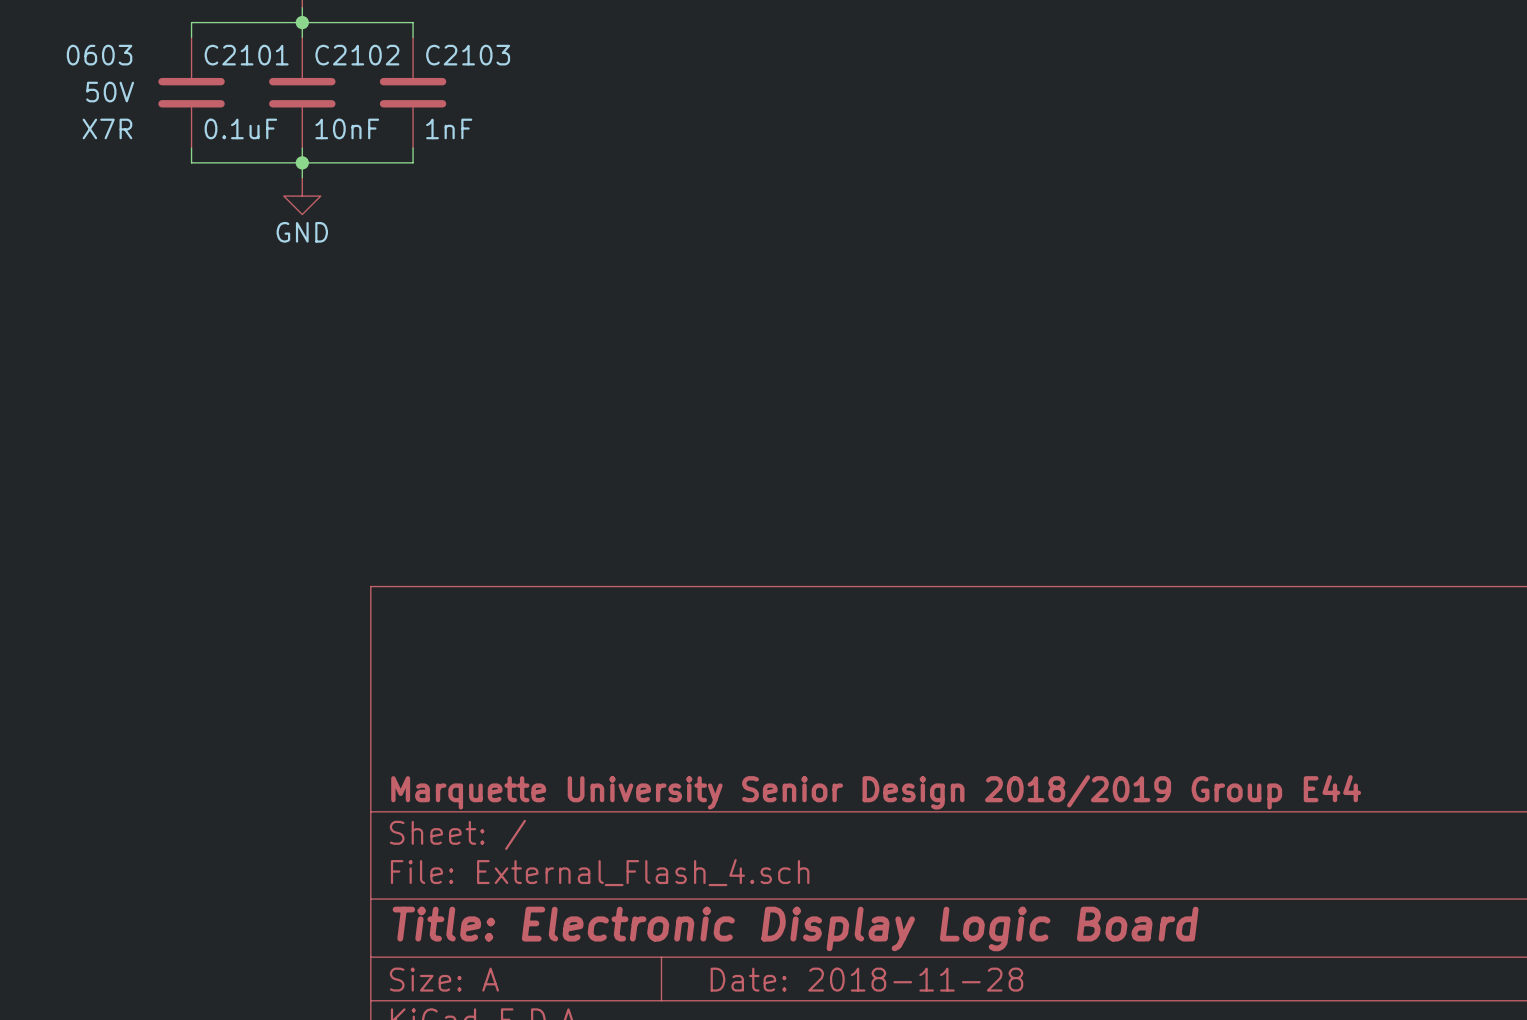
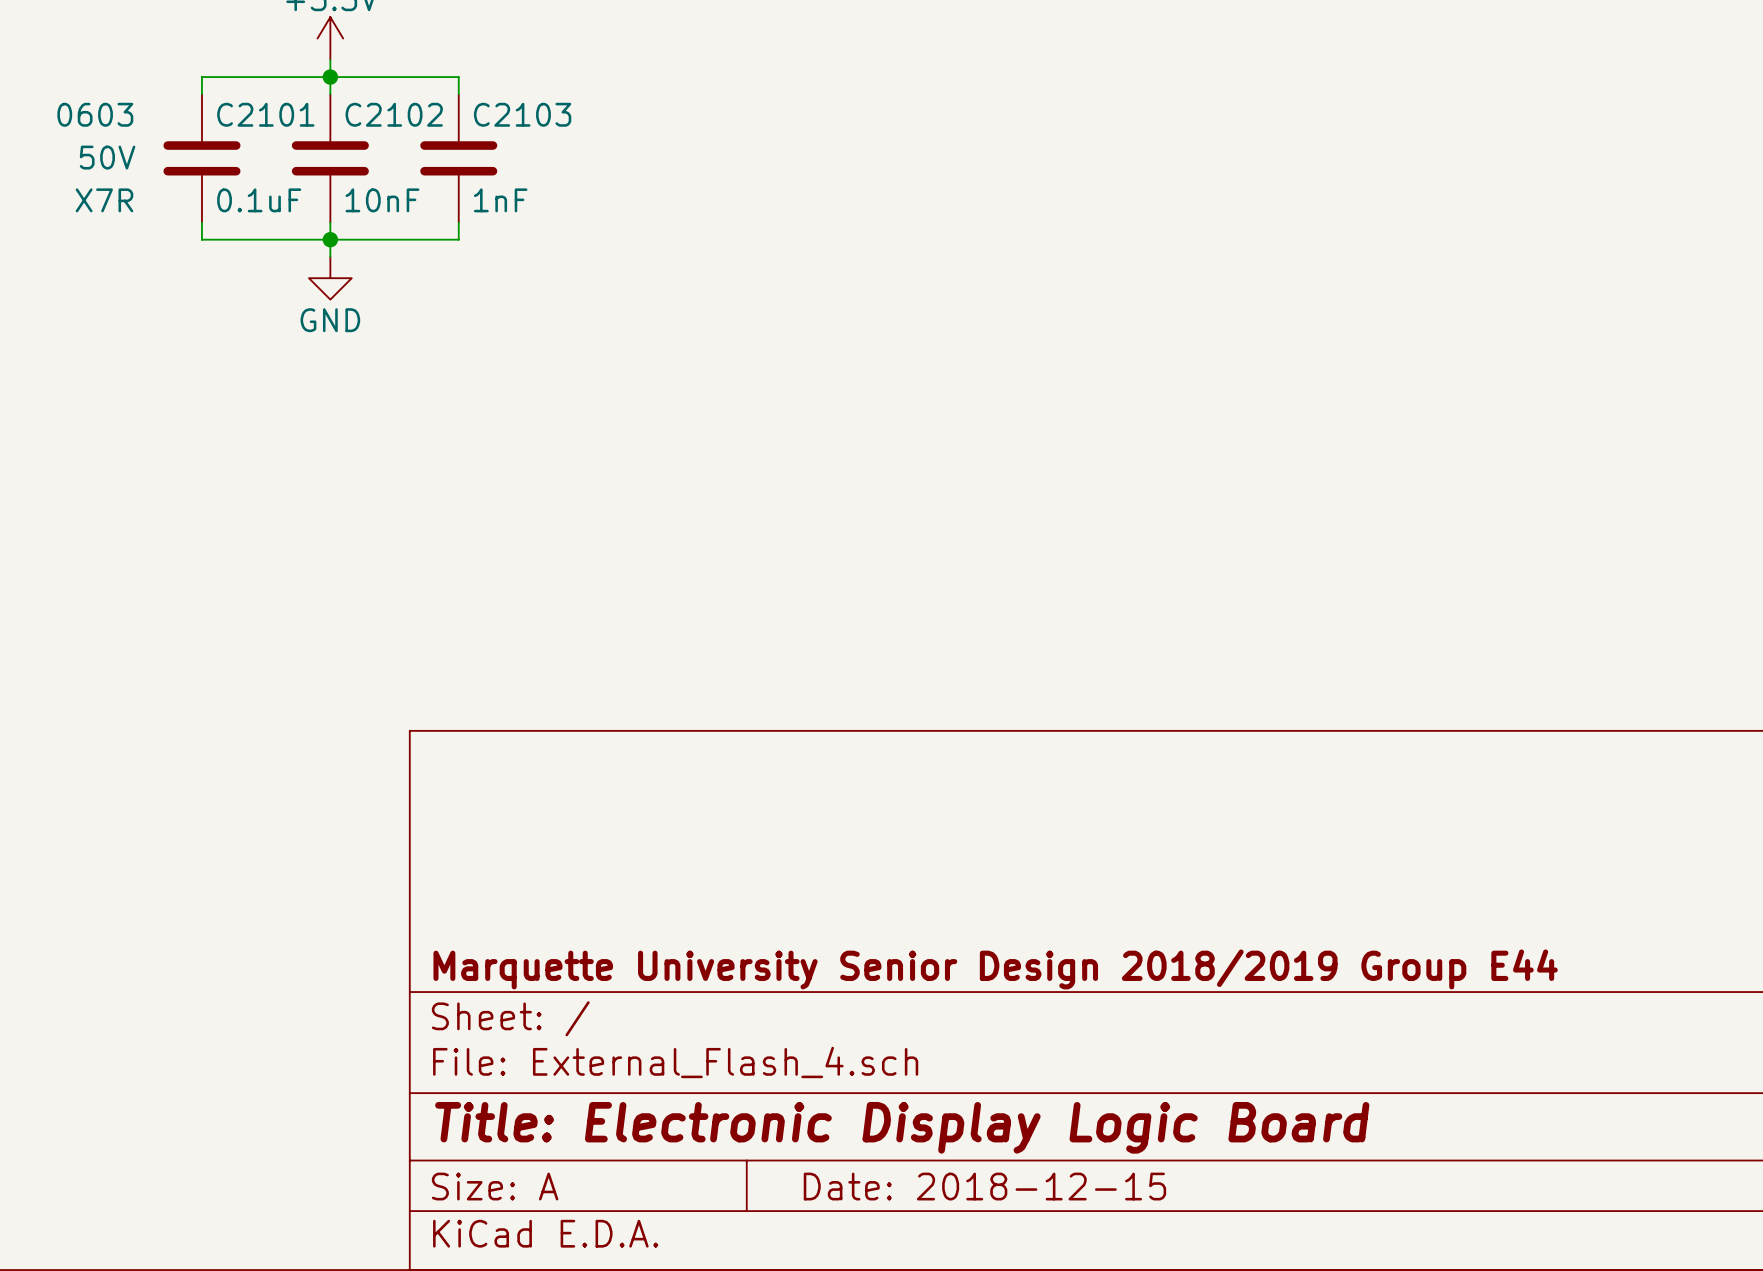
title block: Date: 2018-11-28 (866, 979) -> Date: 2018-12-15 (984, 1186)

